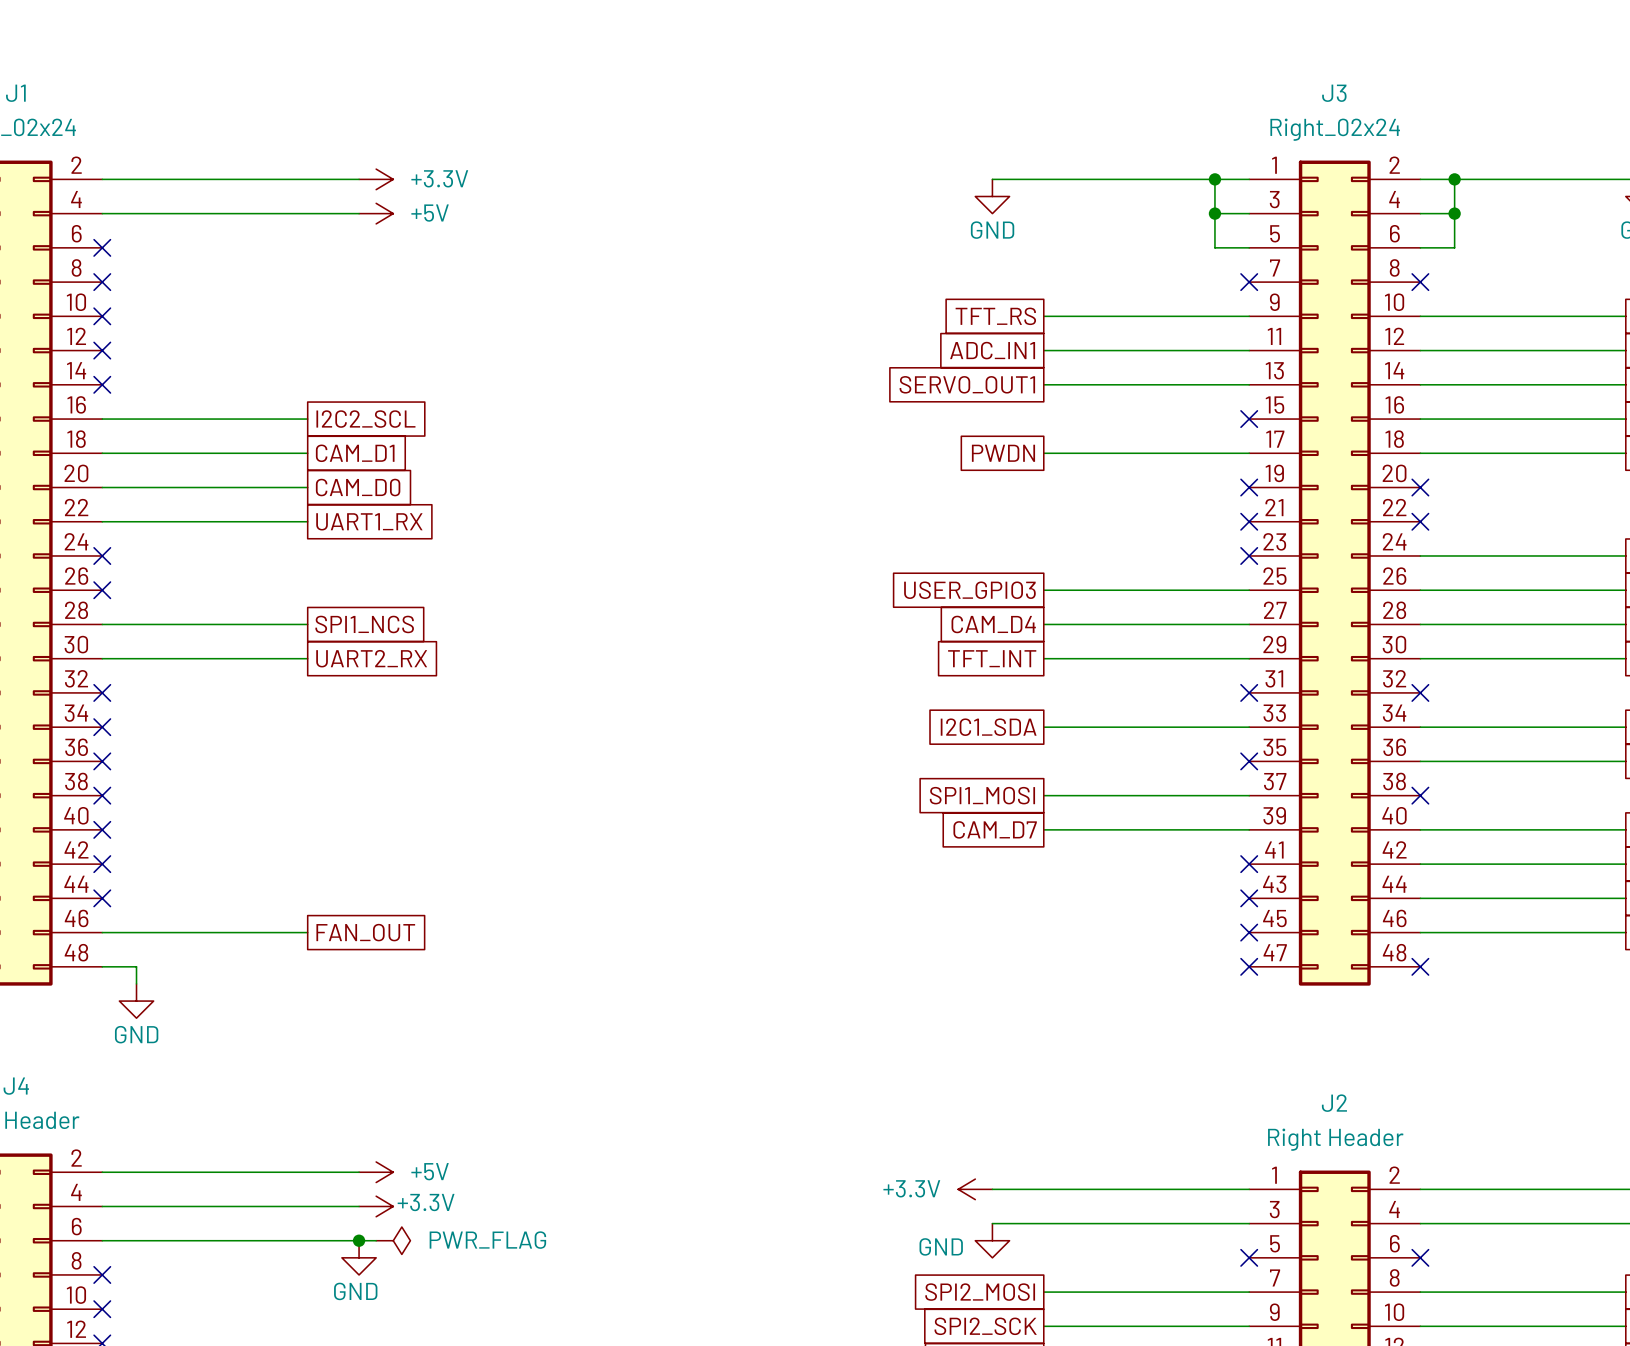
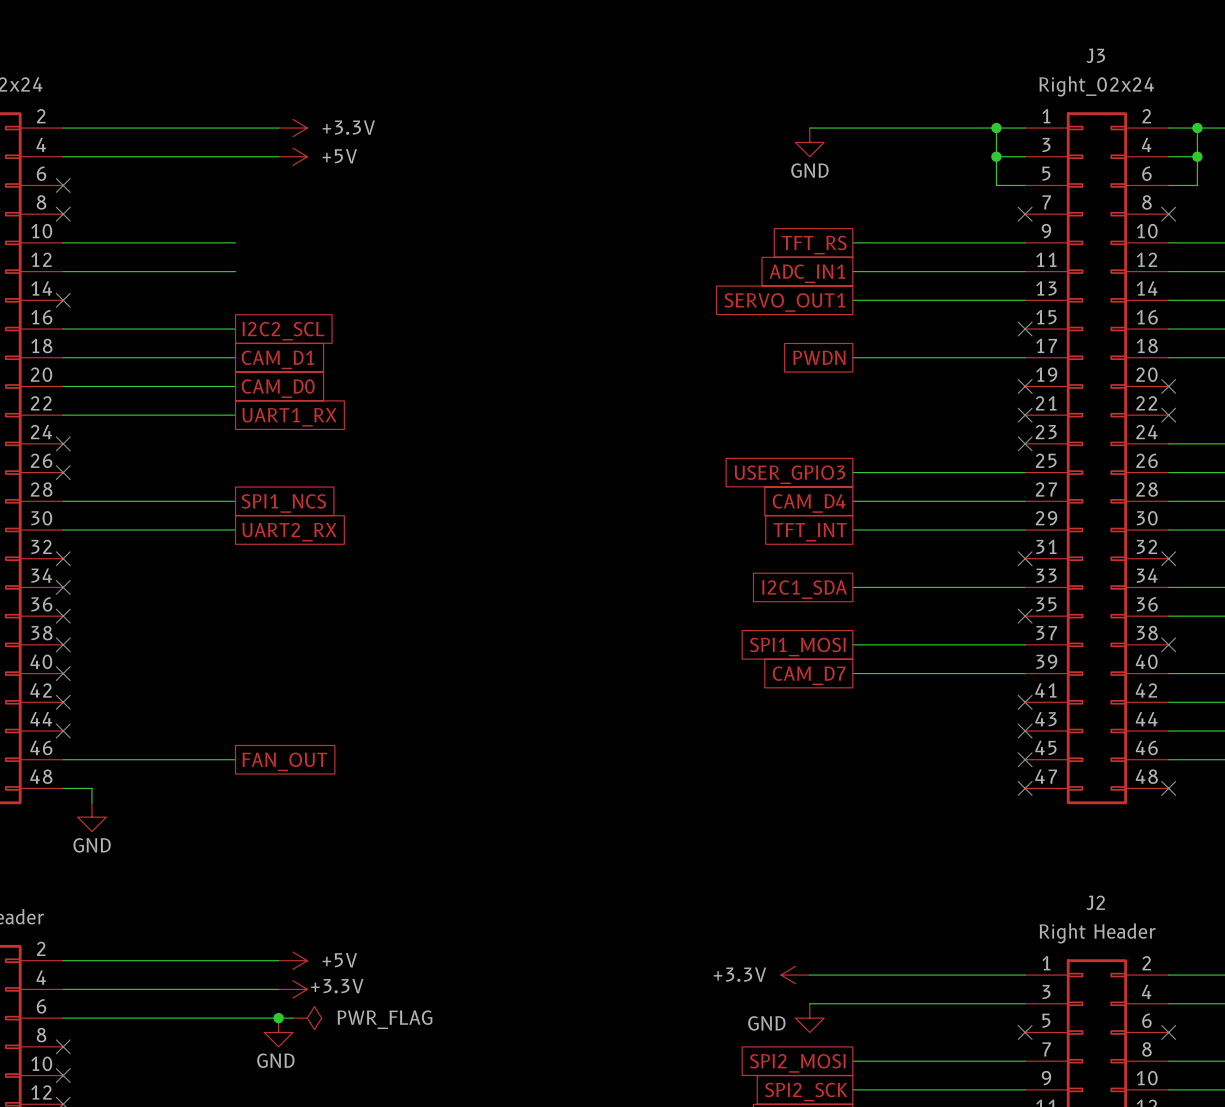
wire: none -> (63, 242) (235, 242)
no-connect mark: (102, 316) -> none
wire: none -> (63, 271) (235, 271)
no-connect mark: (102, 350) -> none

